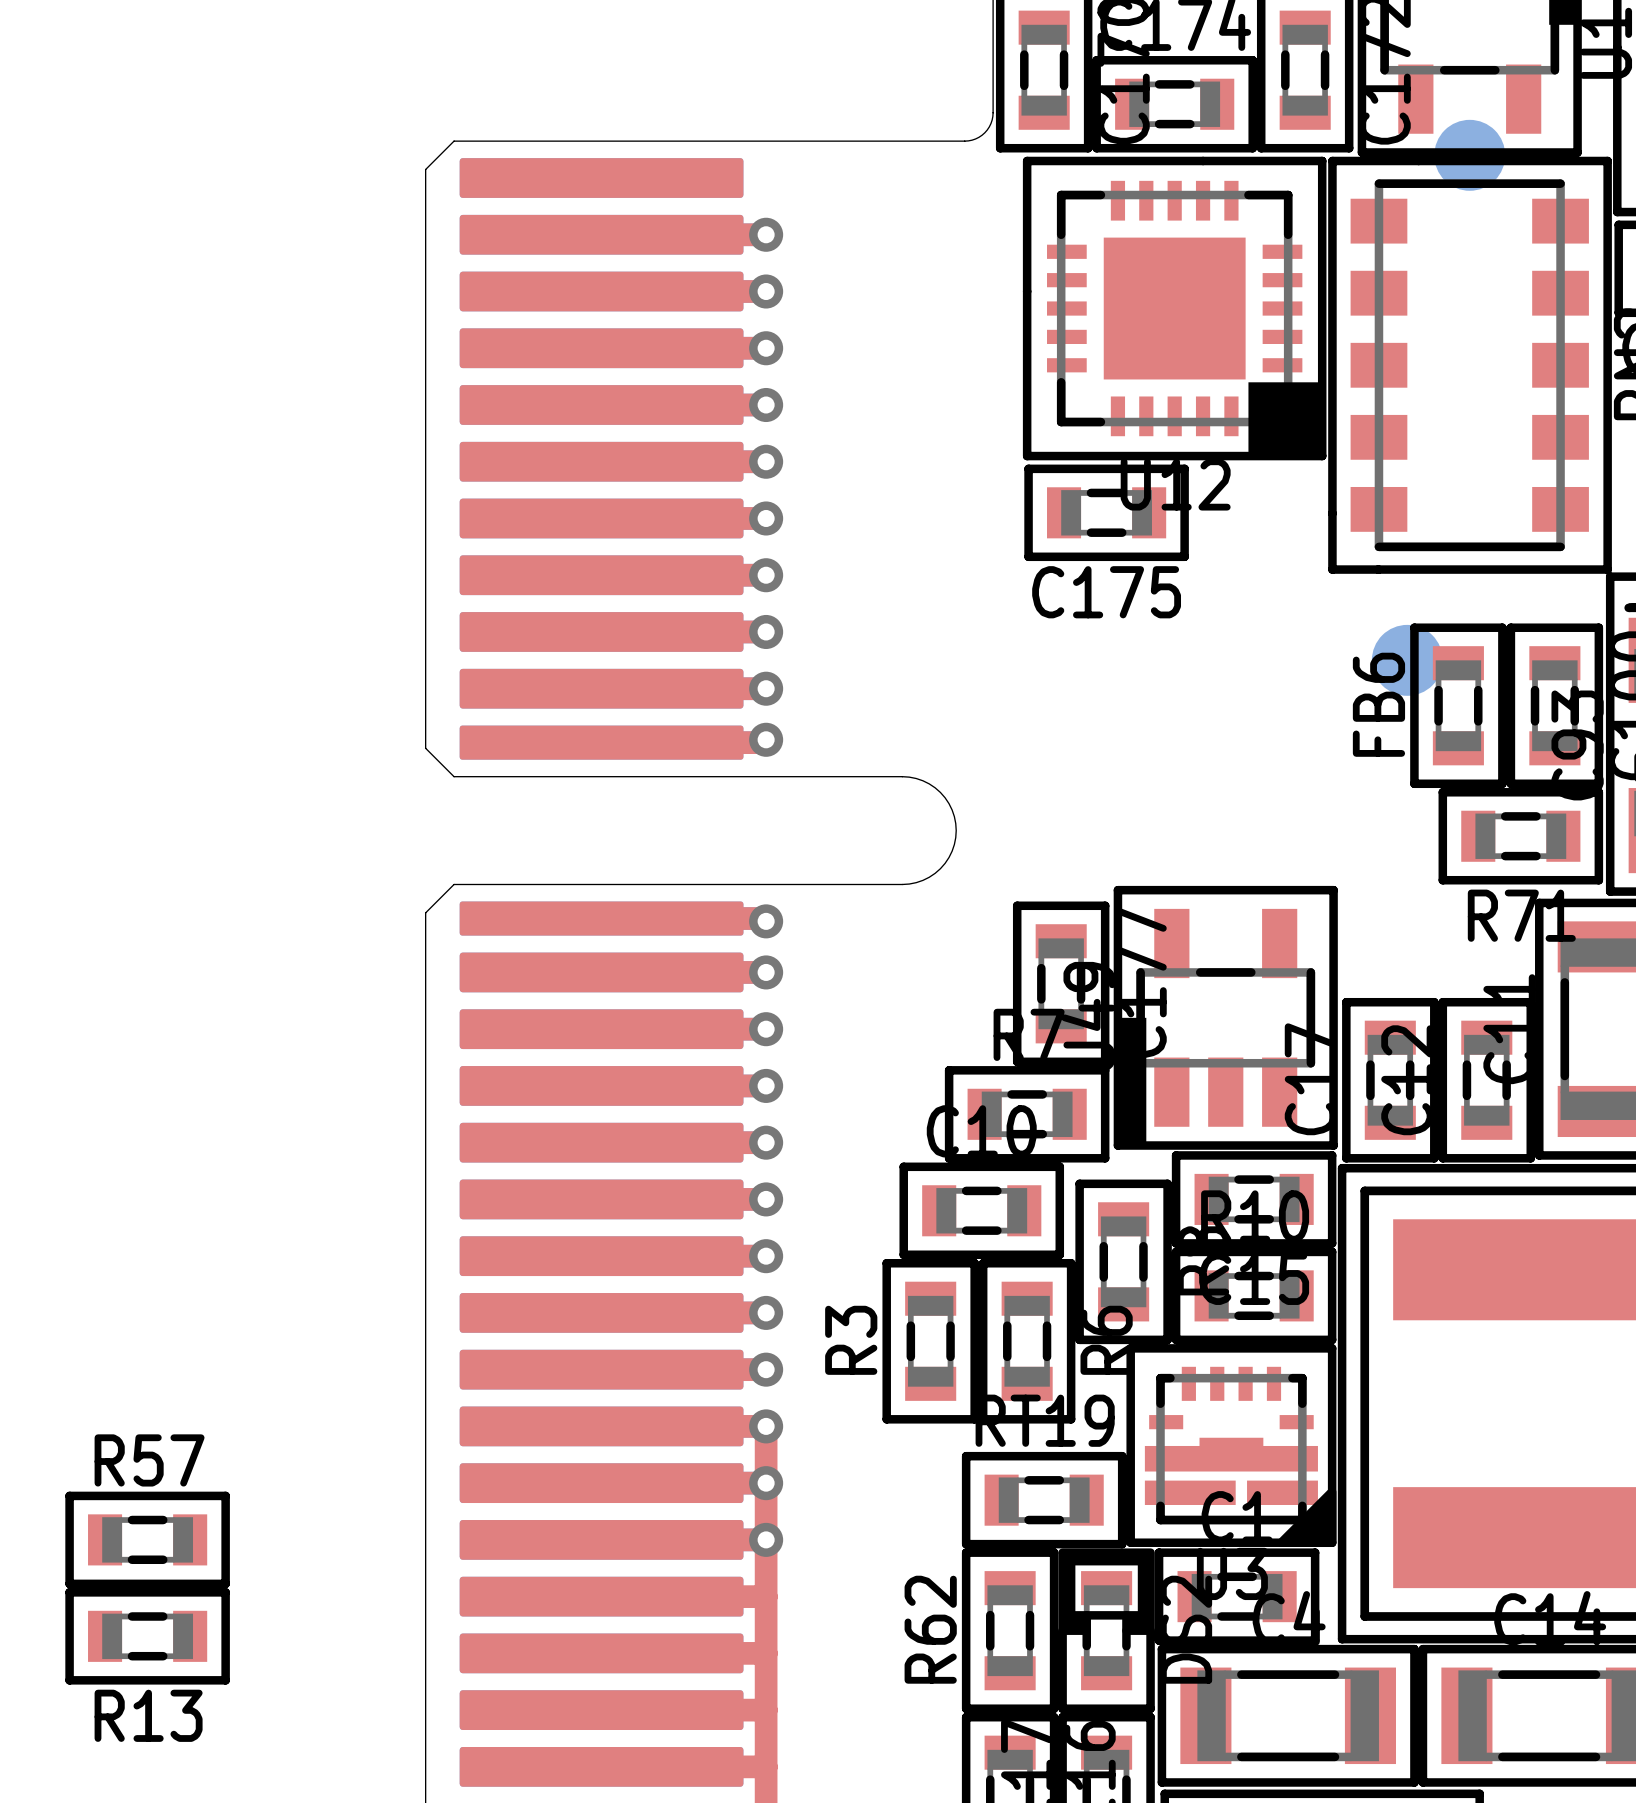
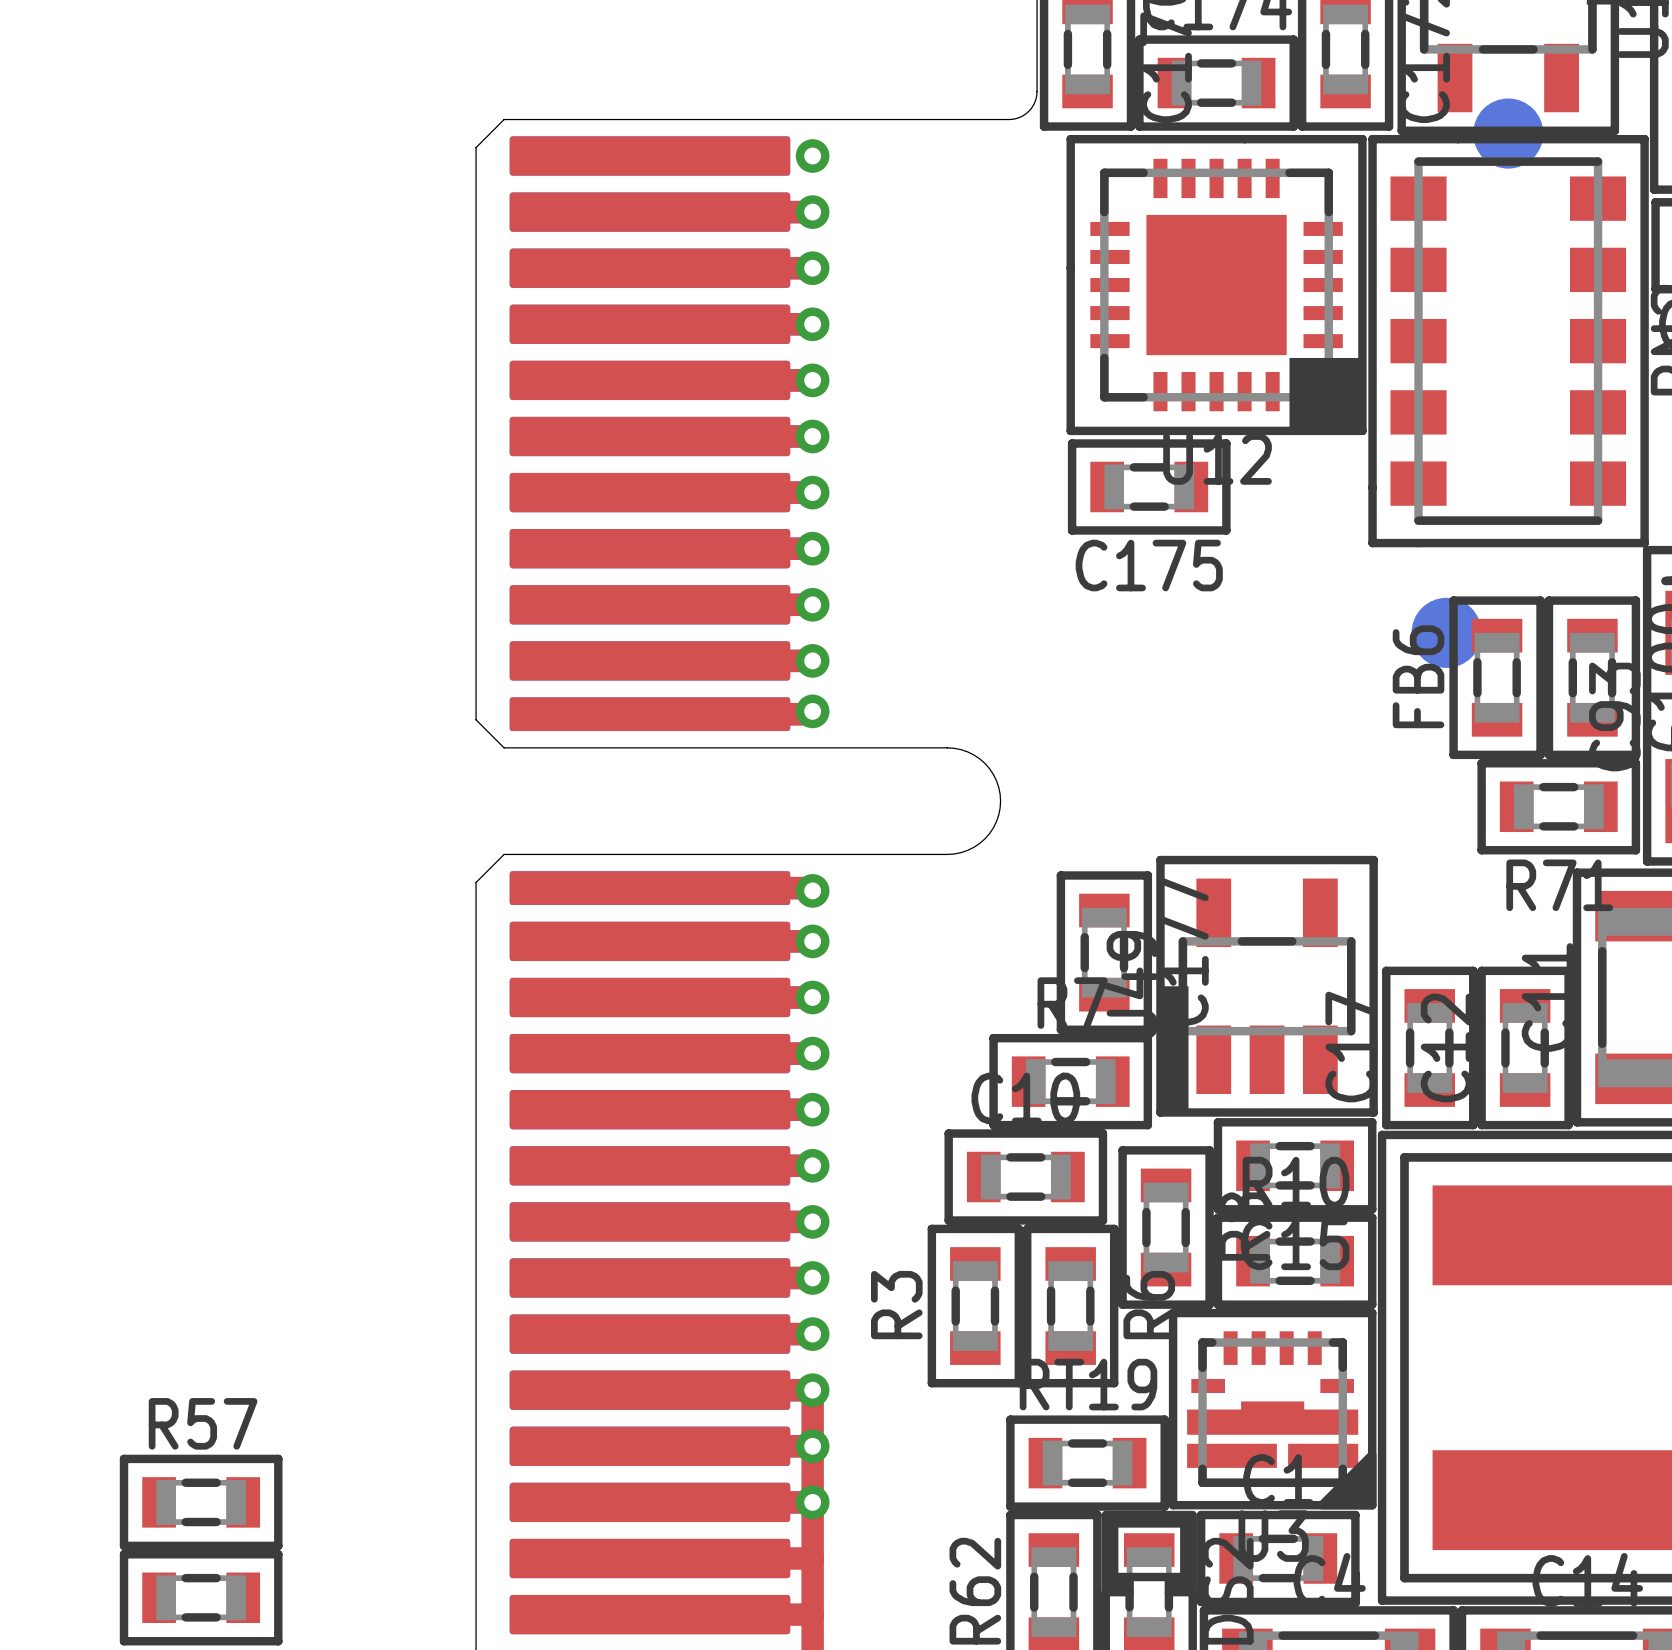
via: none -> (812, 156)

